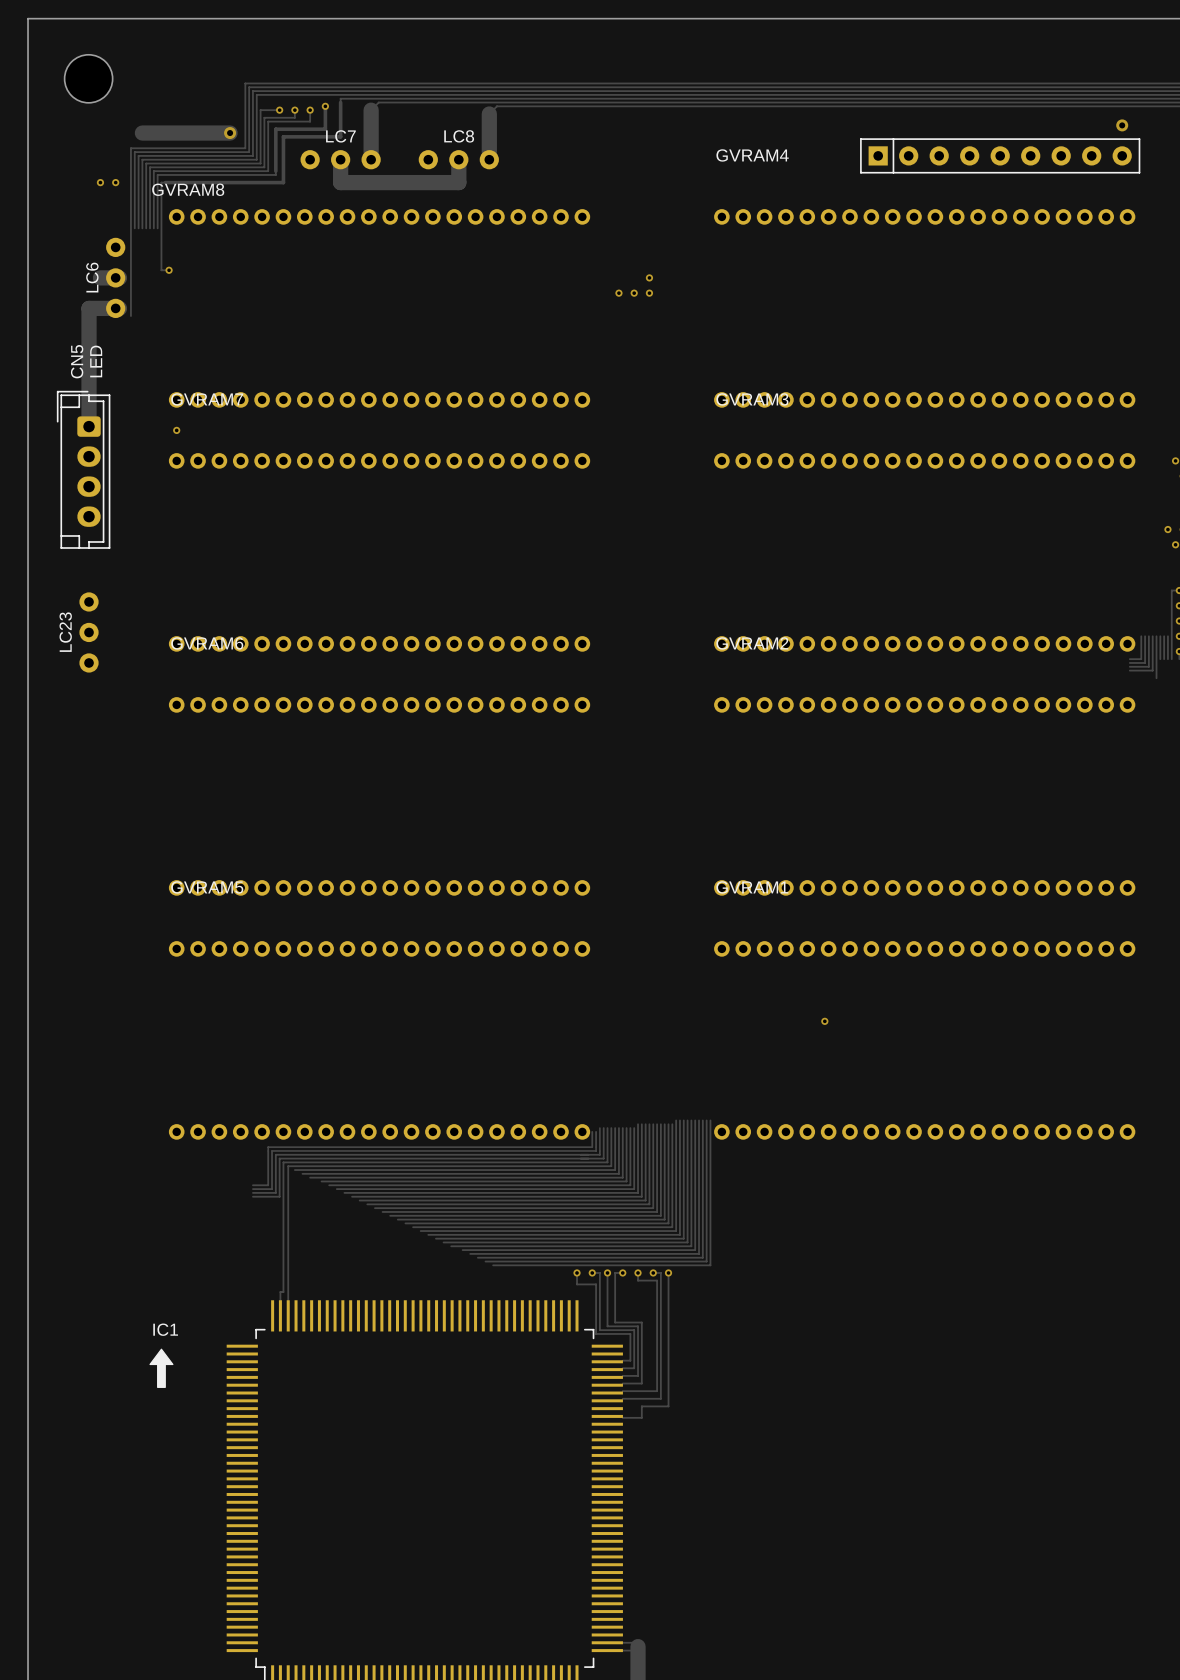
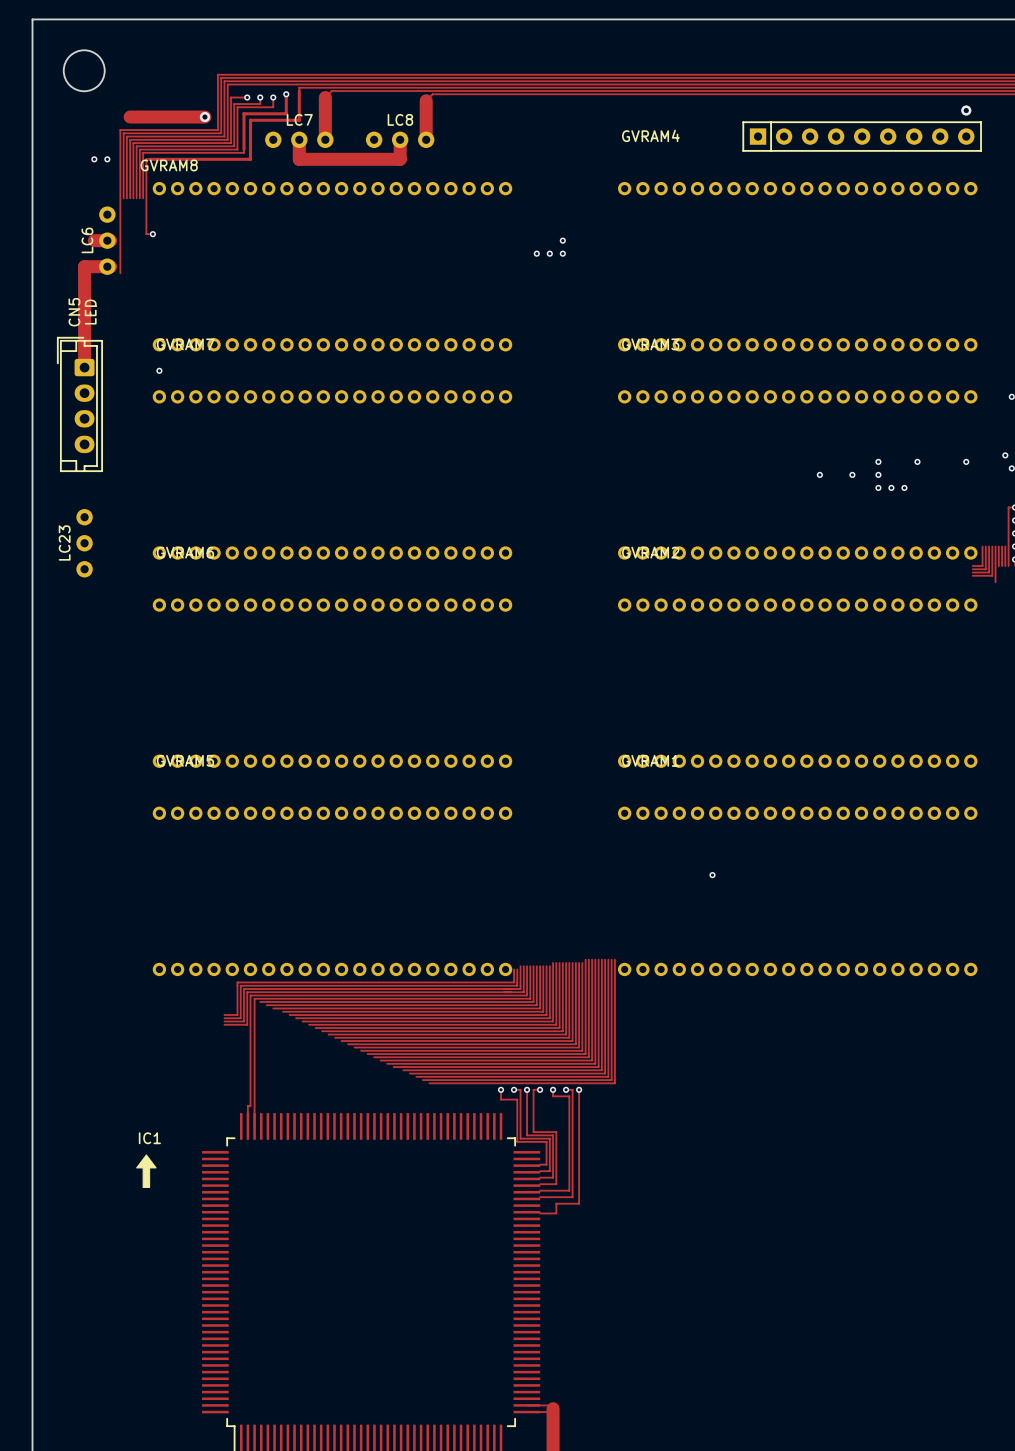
via: none -> (878, 461)
via: none -> (917, 461)
via: none -> (966, 461)
via: none -> (819, 474)
via: none -> (852, 474)
via: none -> (878, 474)
via: none -> (878, 487)
via: none -> (891, 487)
via: none -> (904, 487)

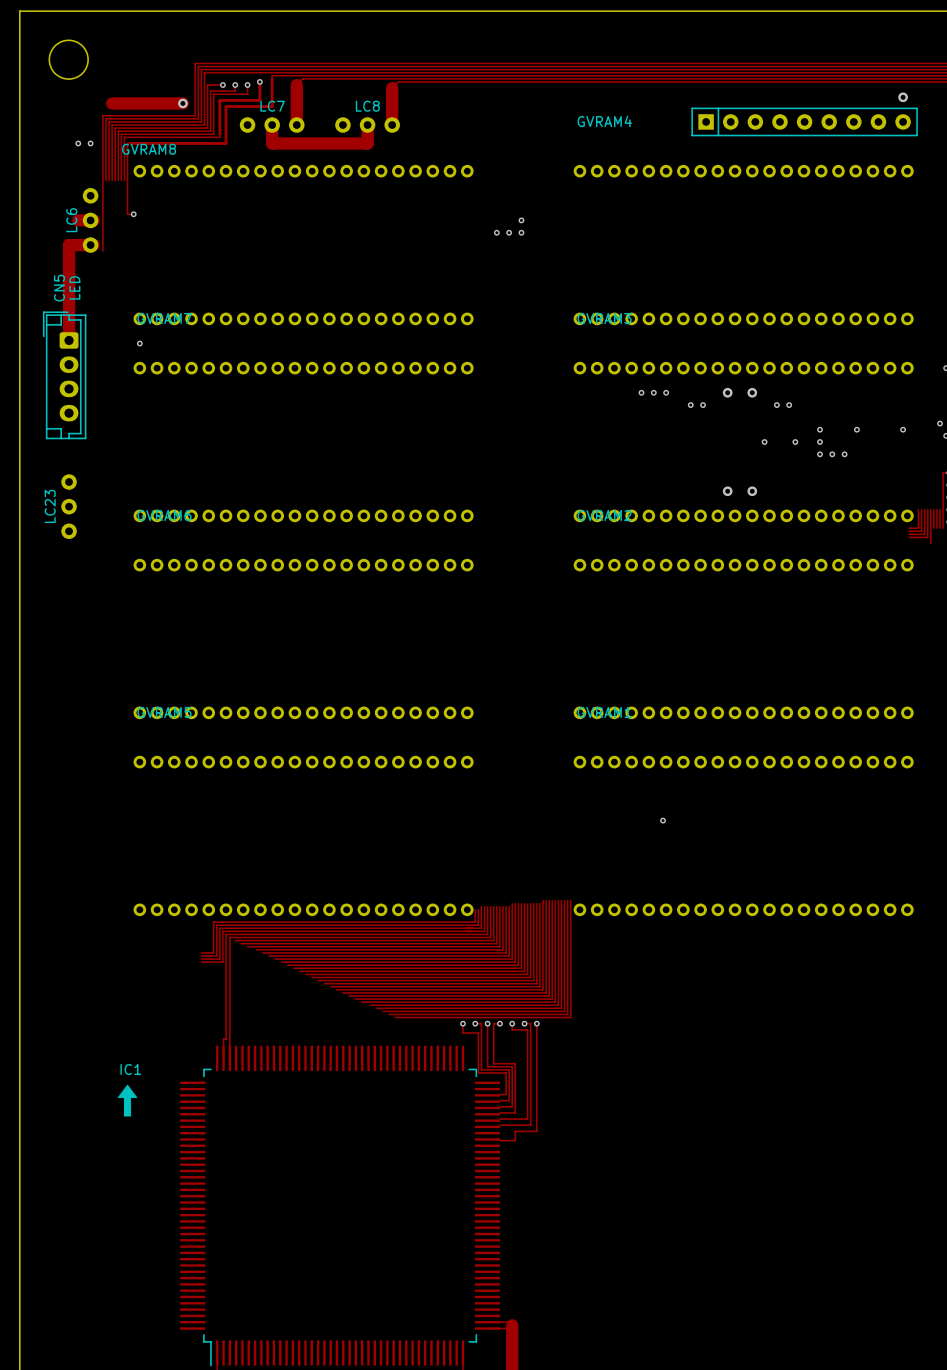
via: none -> (641, 392)
via: none -> (653, 392)
via: none -> (666, 392)
via: none -> (727, 392)
via: none -> (752, 392)
via: none -> (690, 405)
via: none -> (703, 405)
via: none -> (776, 405)
via: none -> (789, 405)
via: none -> (727, 491)
via: none -> (752, 491)

